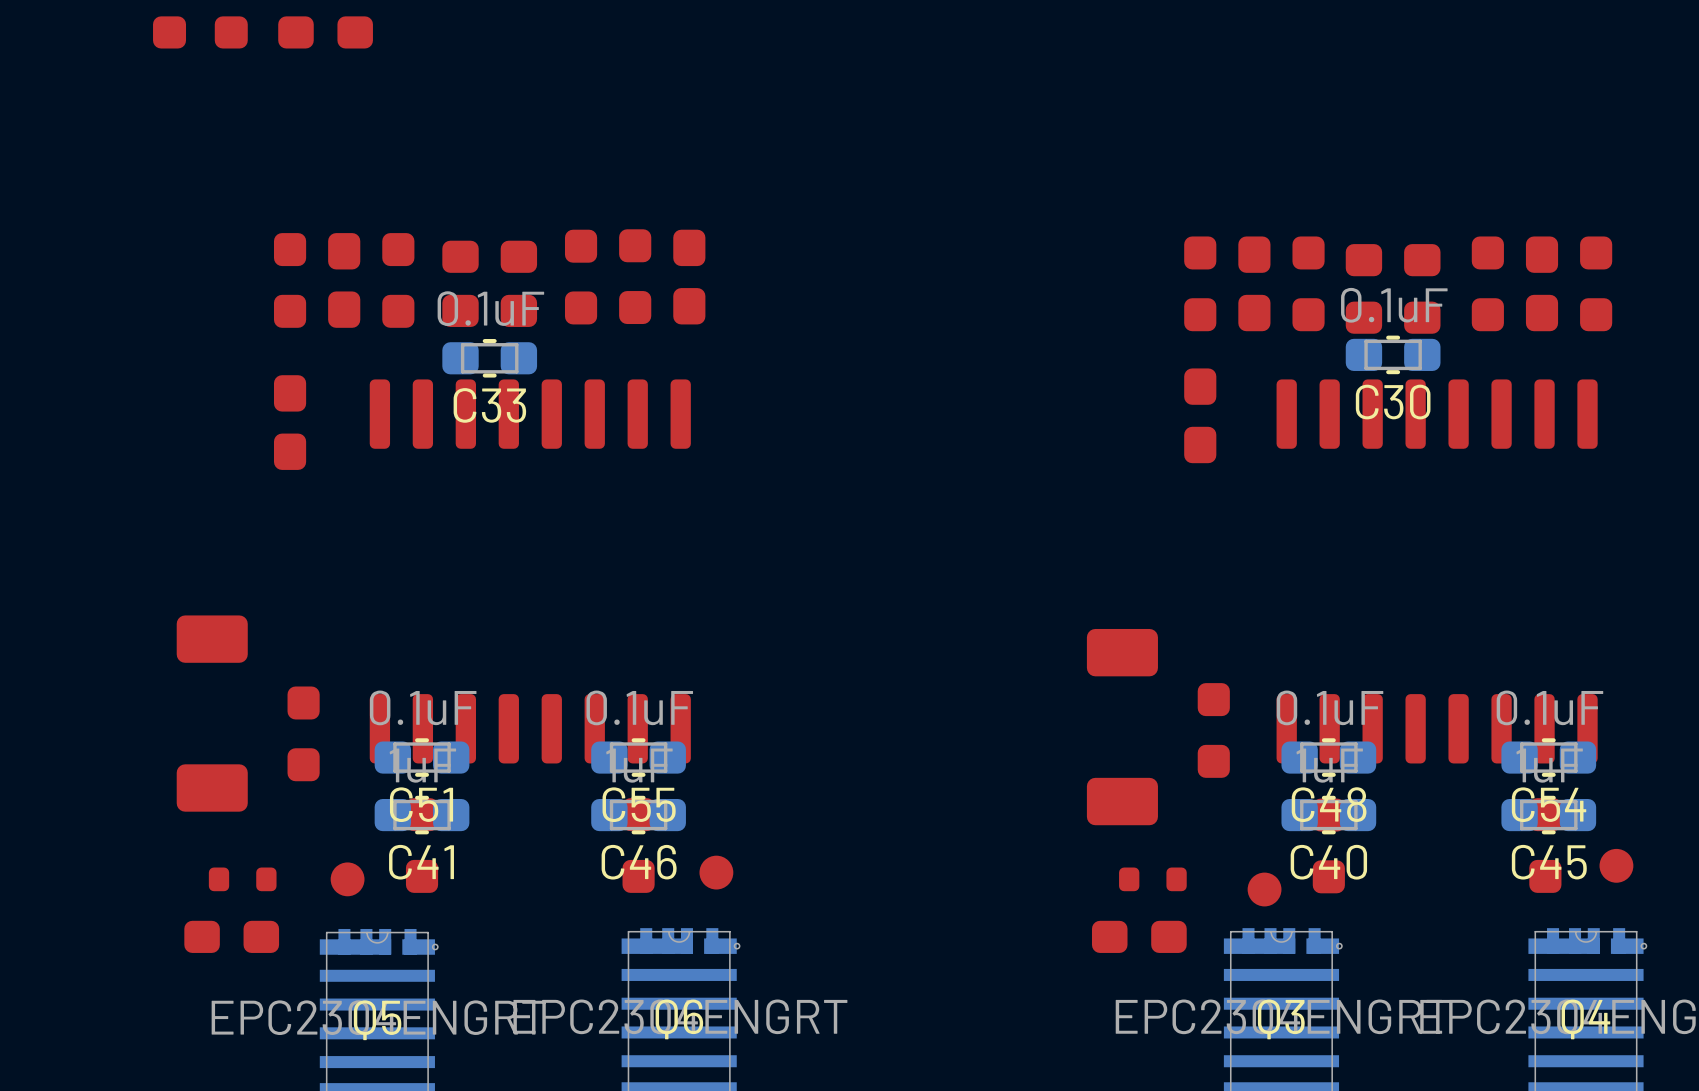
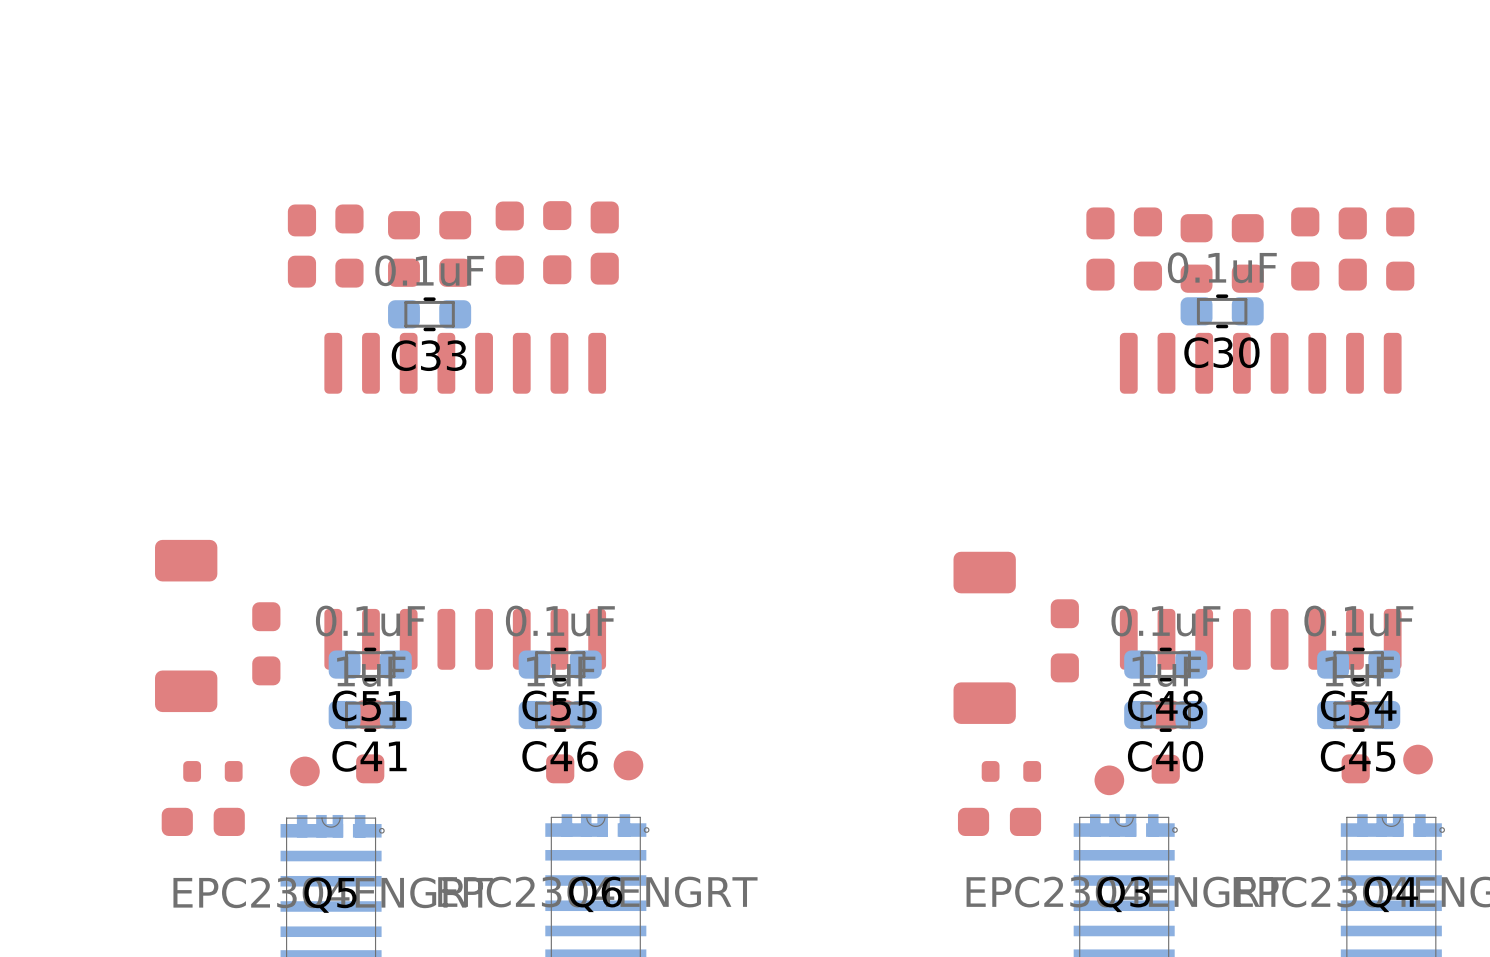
part: (200, 32) -> none
part: (325, 32) -> none
part: (290, 280) -> none
part: (1200, 283) -> none
part: (1200, 415) -> none
part: (290, 422) -> none

